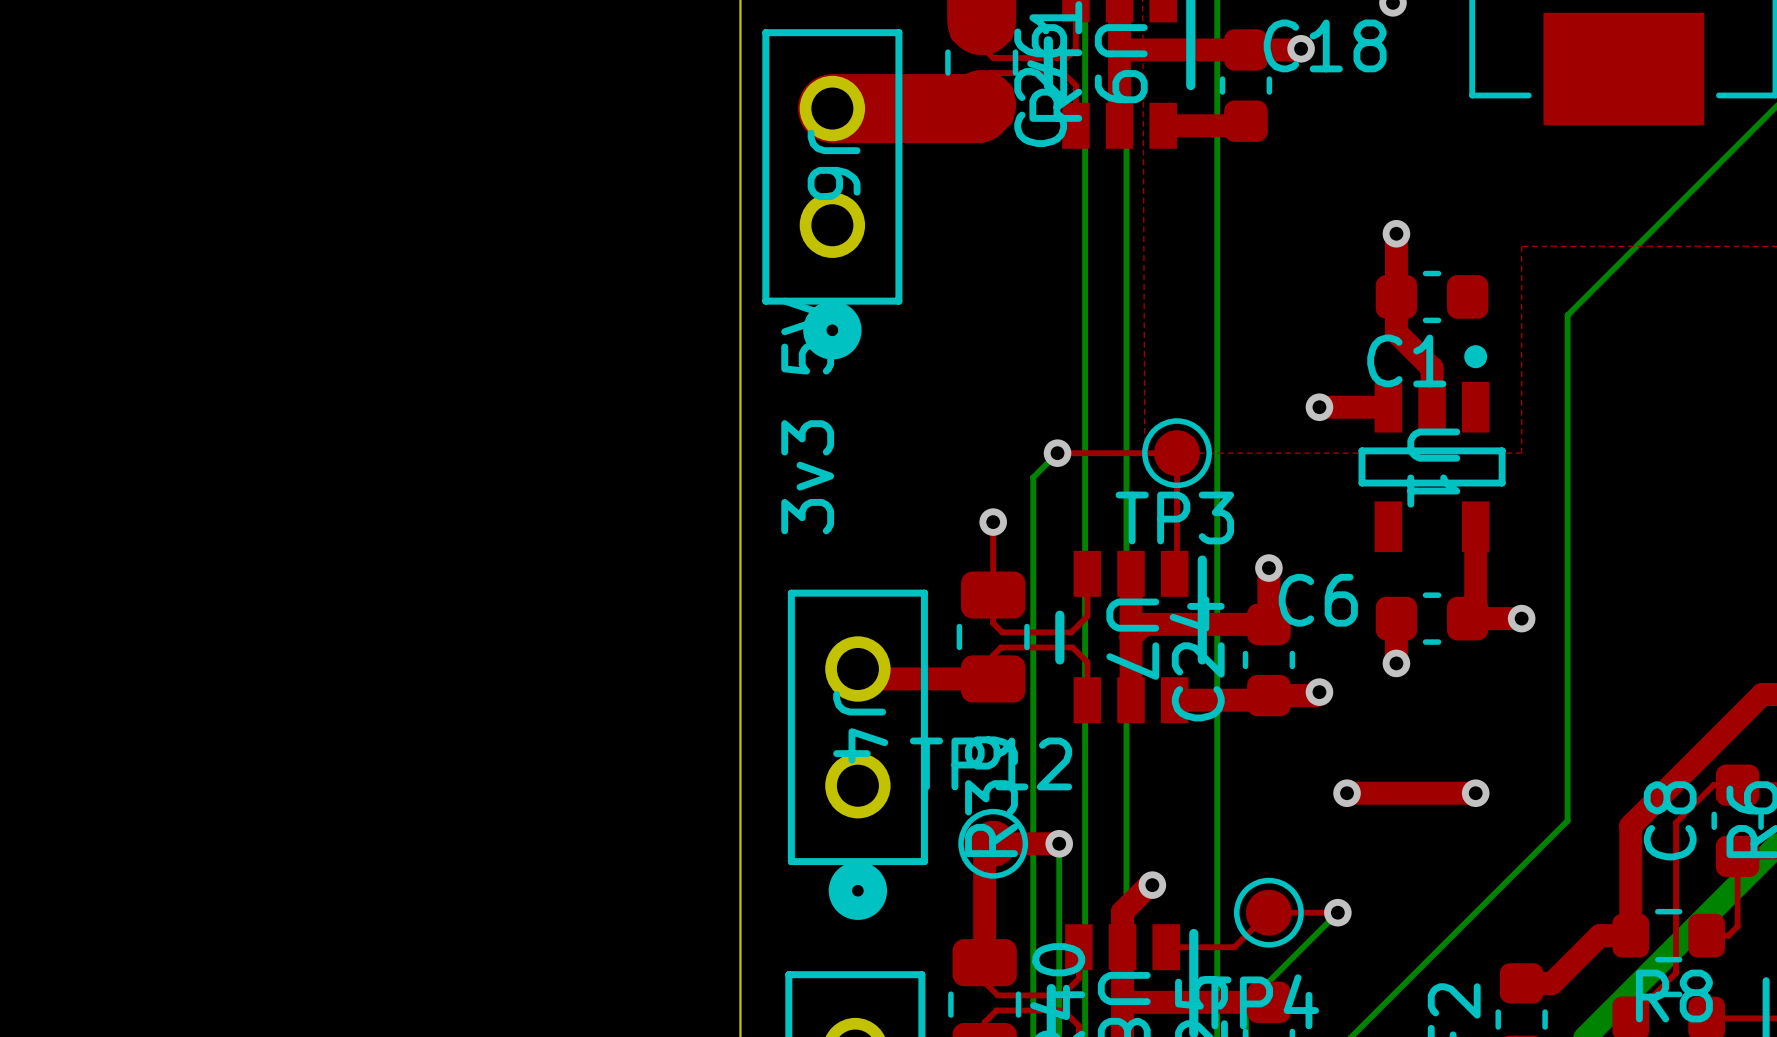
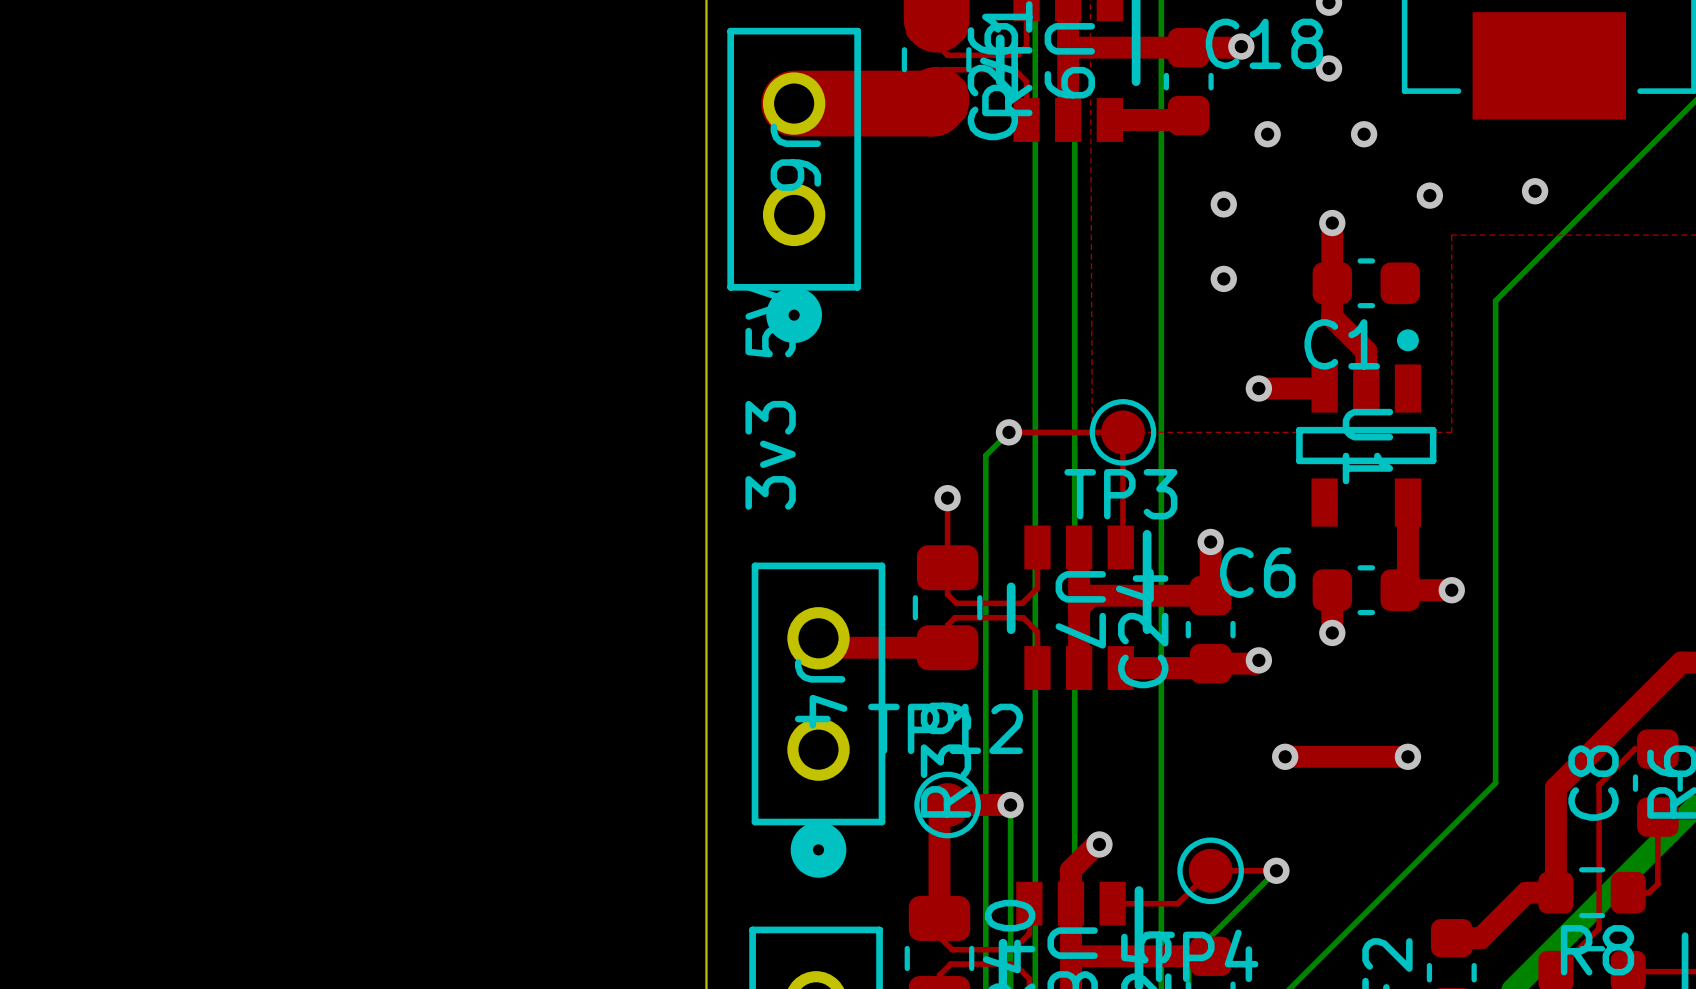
via: none -> (1329, 68)
via: none -> (1267, 134)
via: none -> (1364, 134)
via: none -> (1535, 191)
via: none -> (1429, 195)
via: none -> (1223, 204)
via: none -> (1223, 278)

